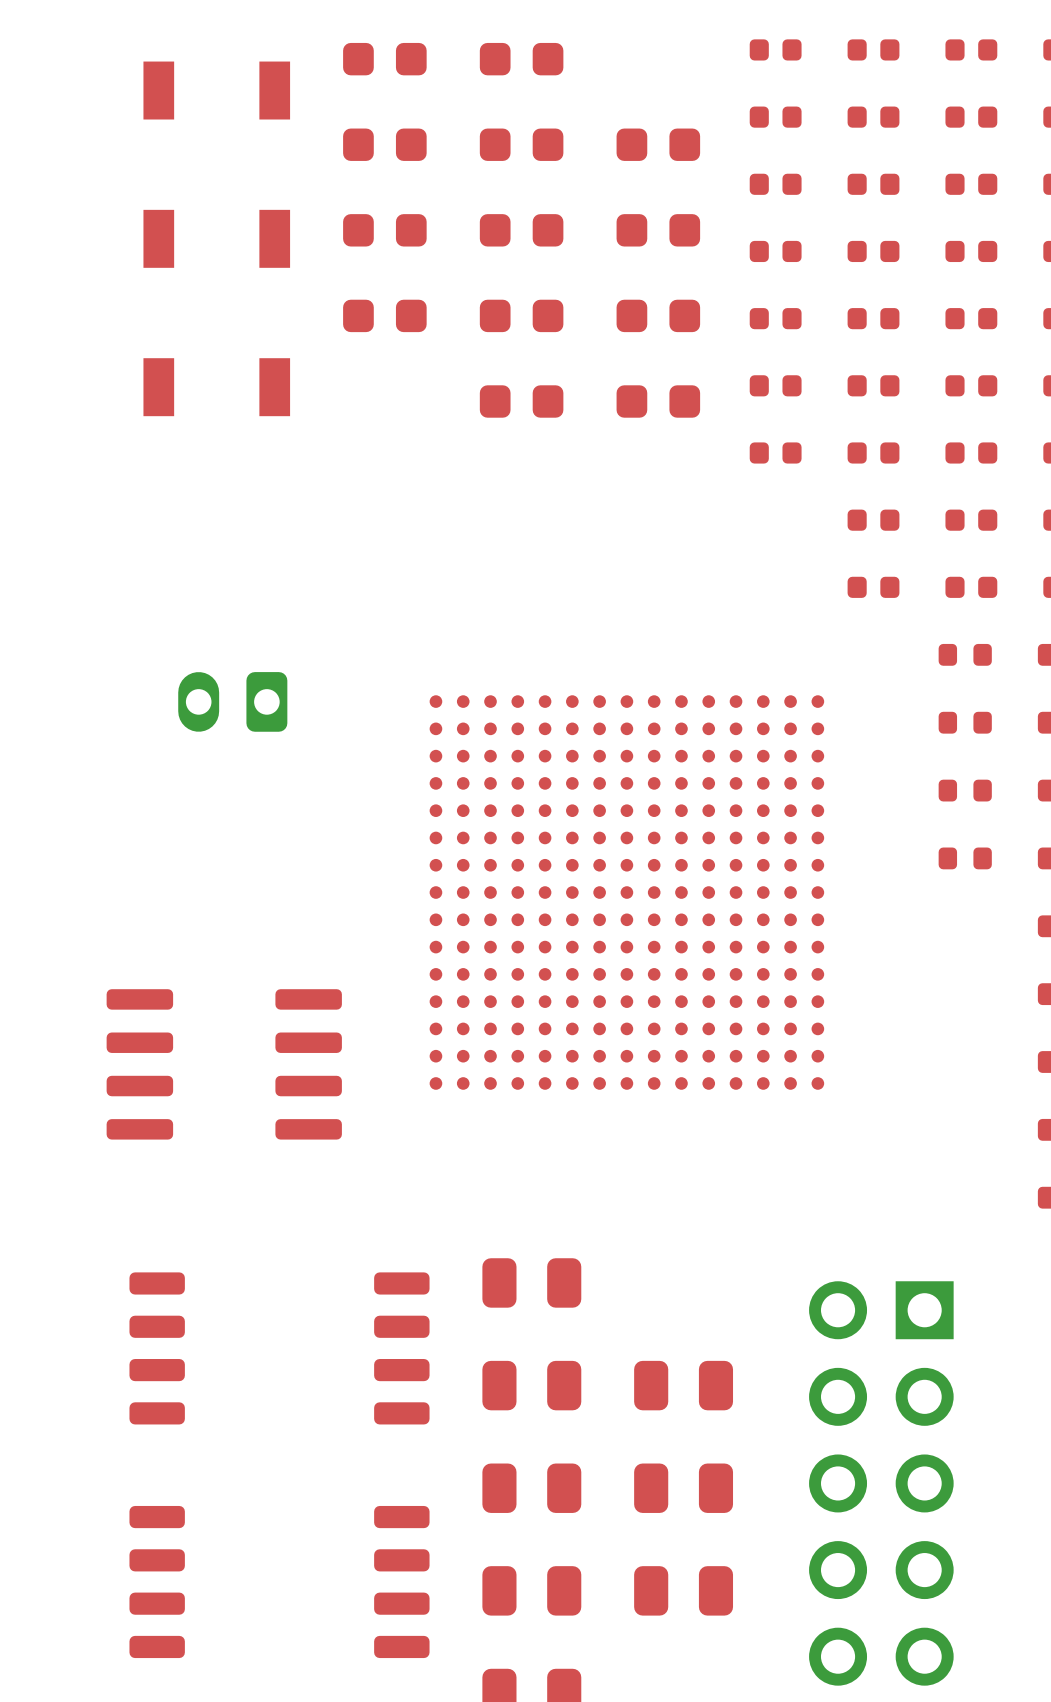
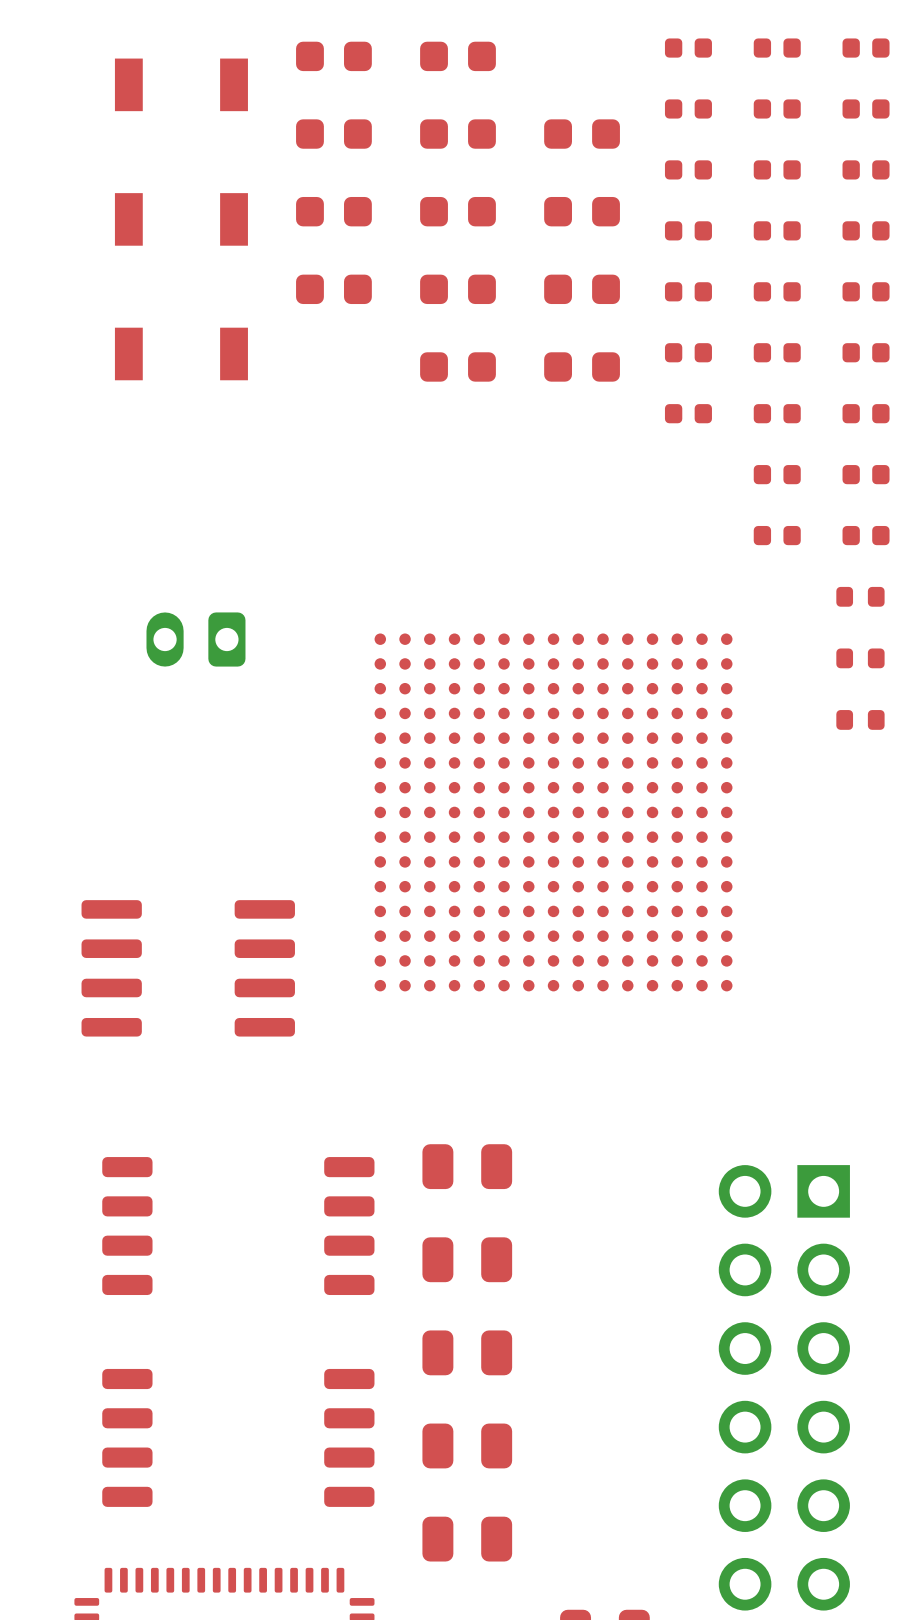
part: (965, 858) -> none
part: (683, 1385) -> none
part: (683, 1488) -> none
part: (683, 1590) -> none

